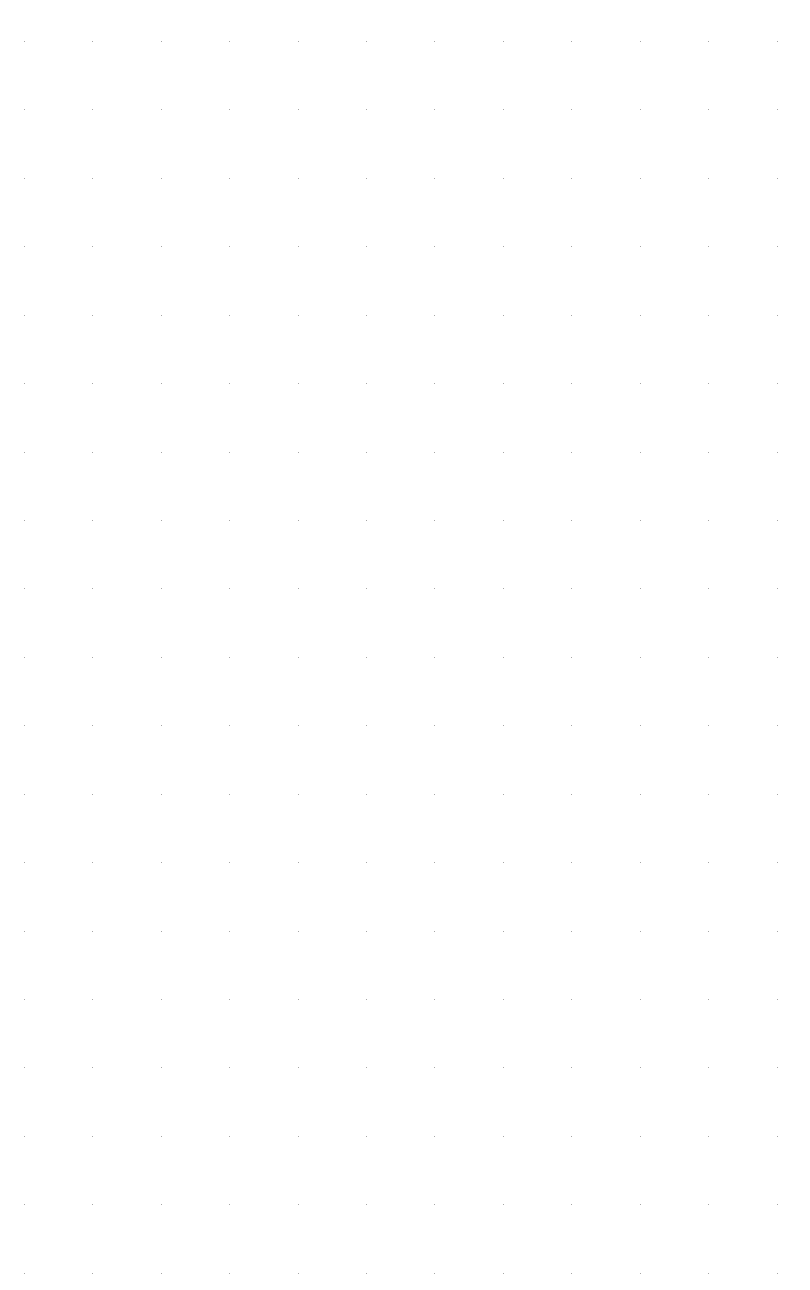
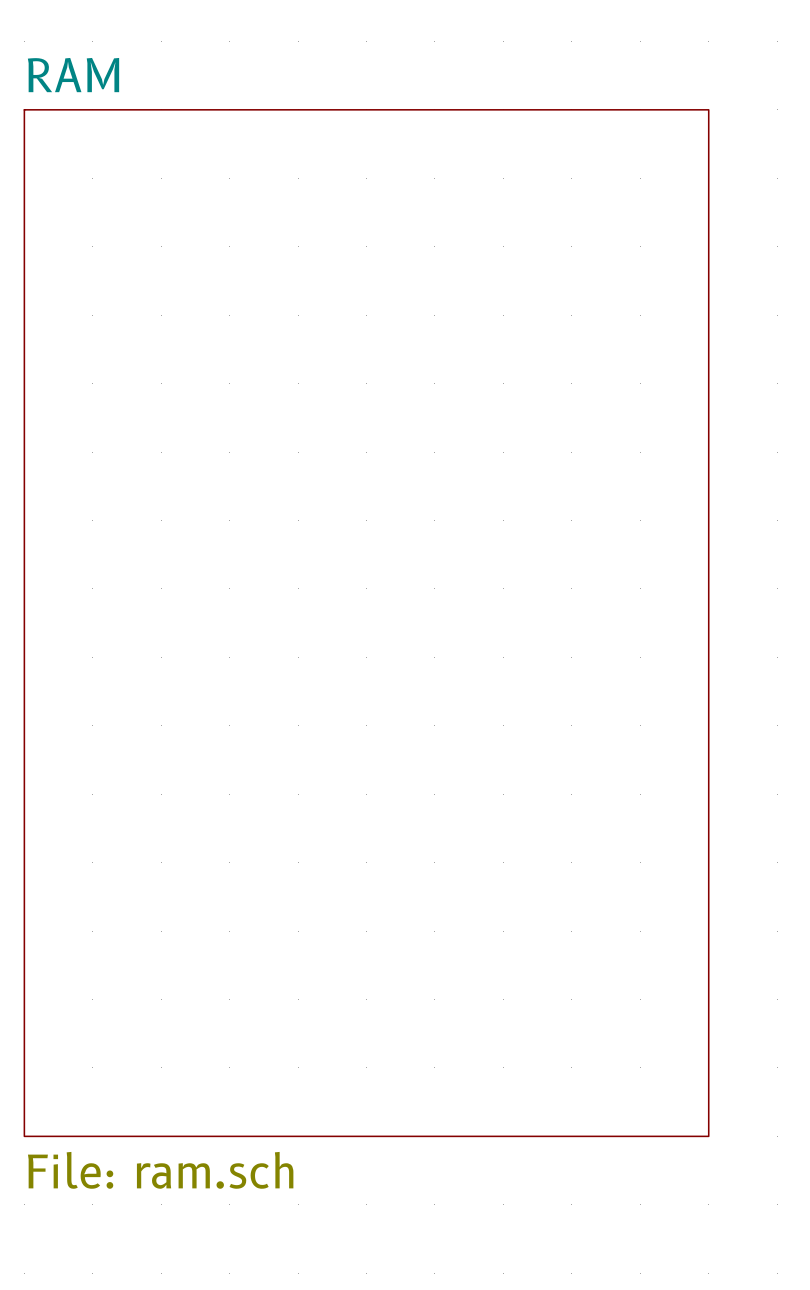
sheet RAM: none -> File: ram.sch (366, 623)

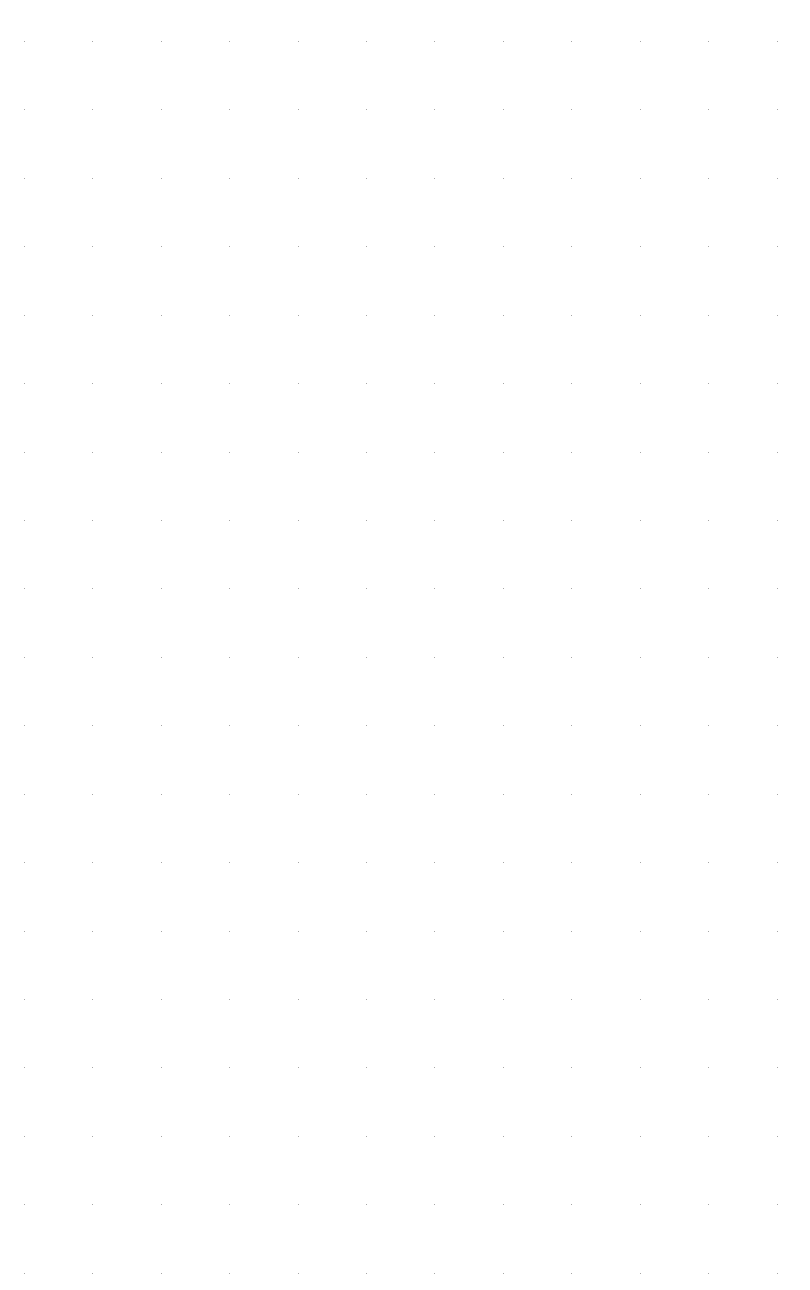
sheet RAM: File: ram.sch (366, 623) -> none

